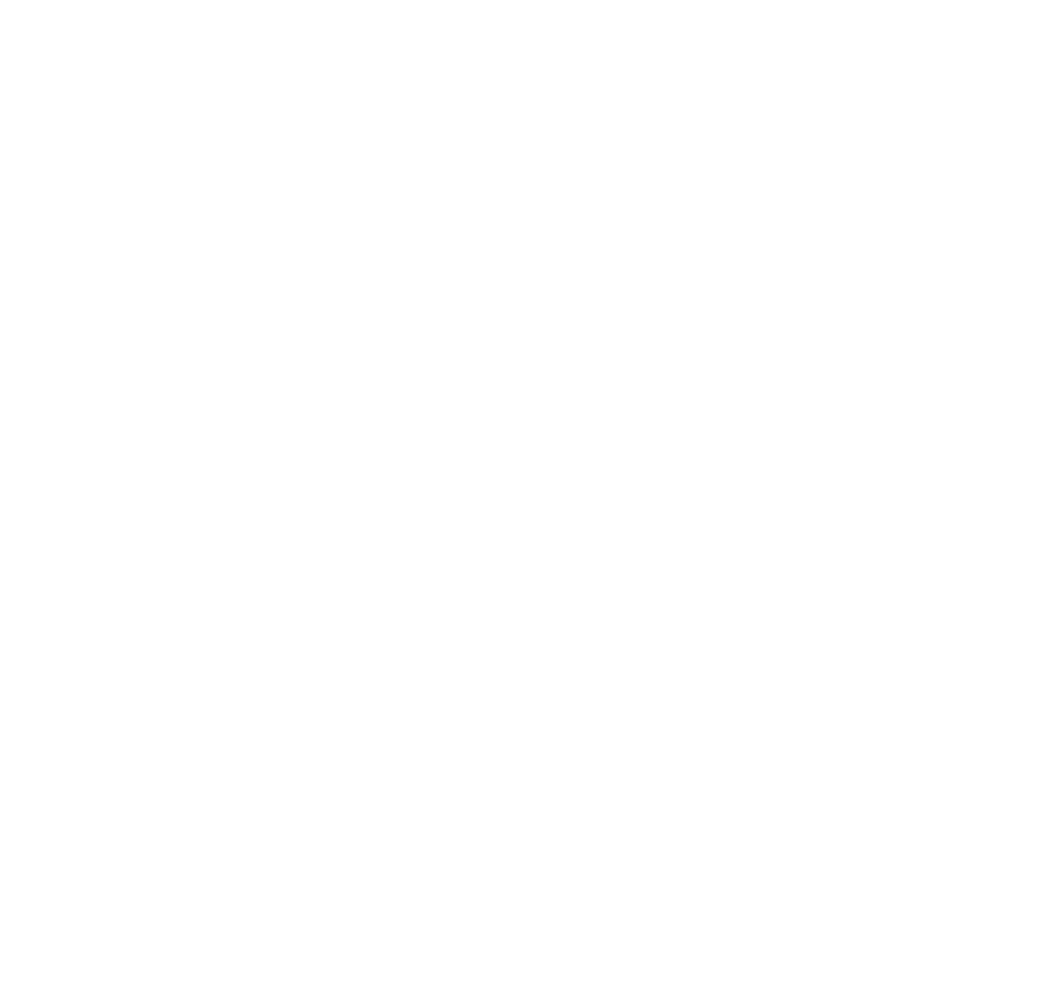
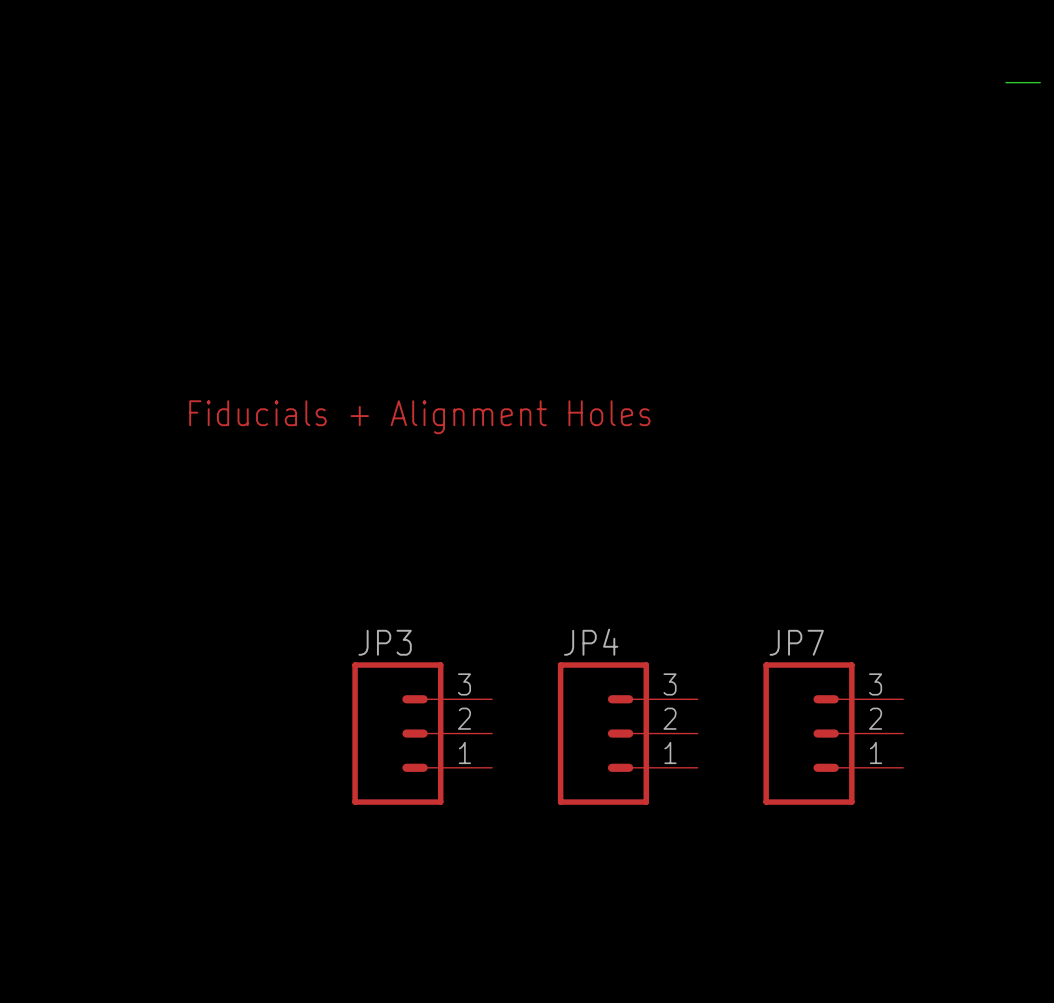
wire: none -> (1005, 82) (1040, 82)
text: none -> Fiducials + Alignment Holes (419, 417)
JP3: none -> (422, 733)
JP4: none -> (627, 733)
JP7: none -> (833, 733)

